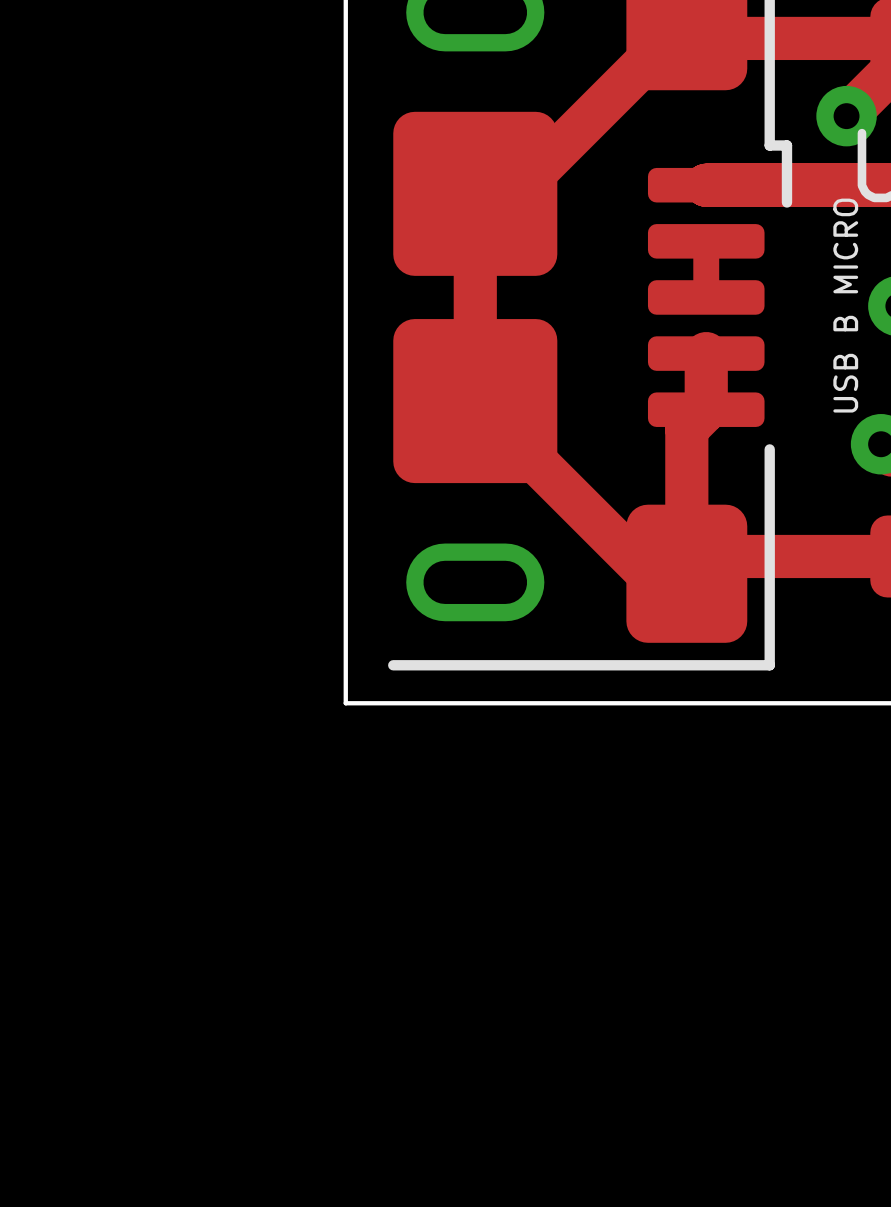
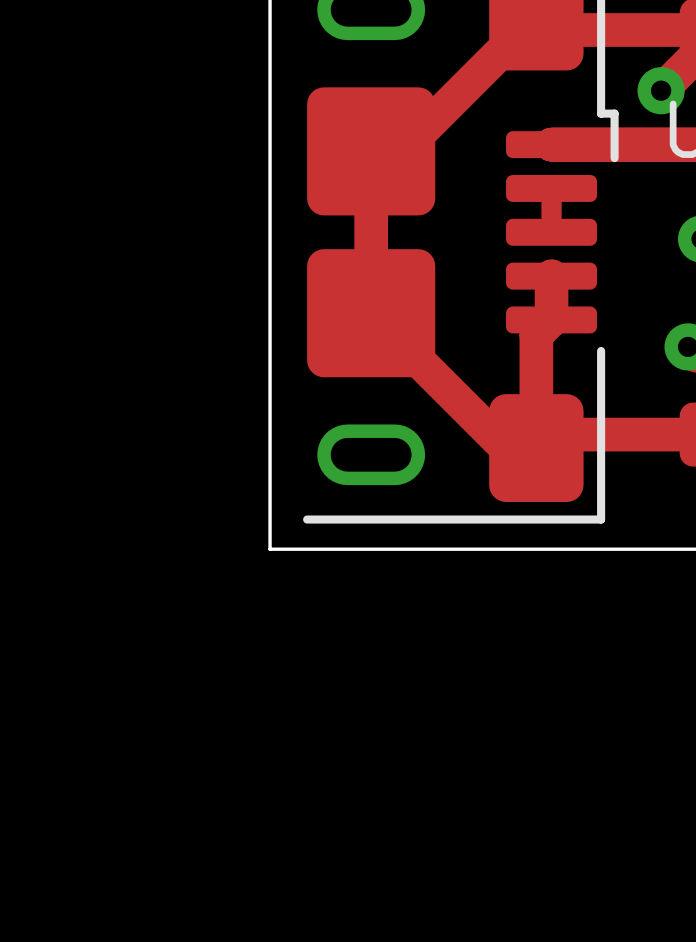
USB B MICRO name: USB B MICRO (845, 305) -> none

